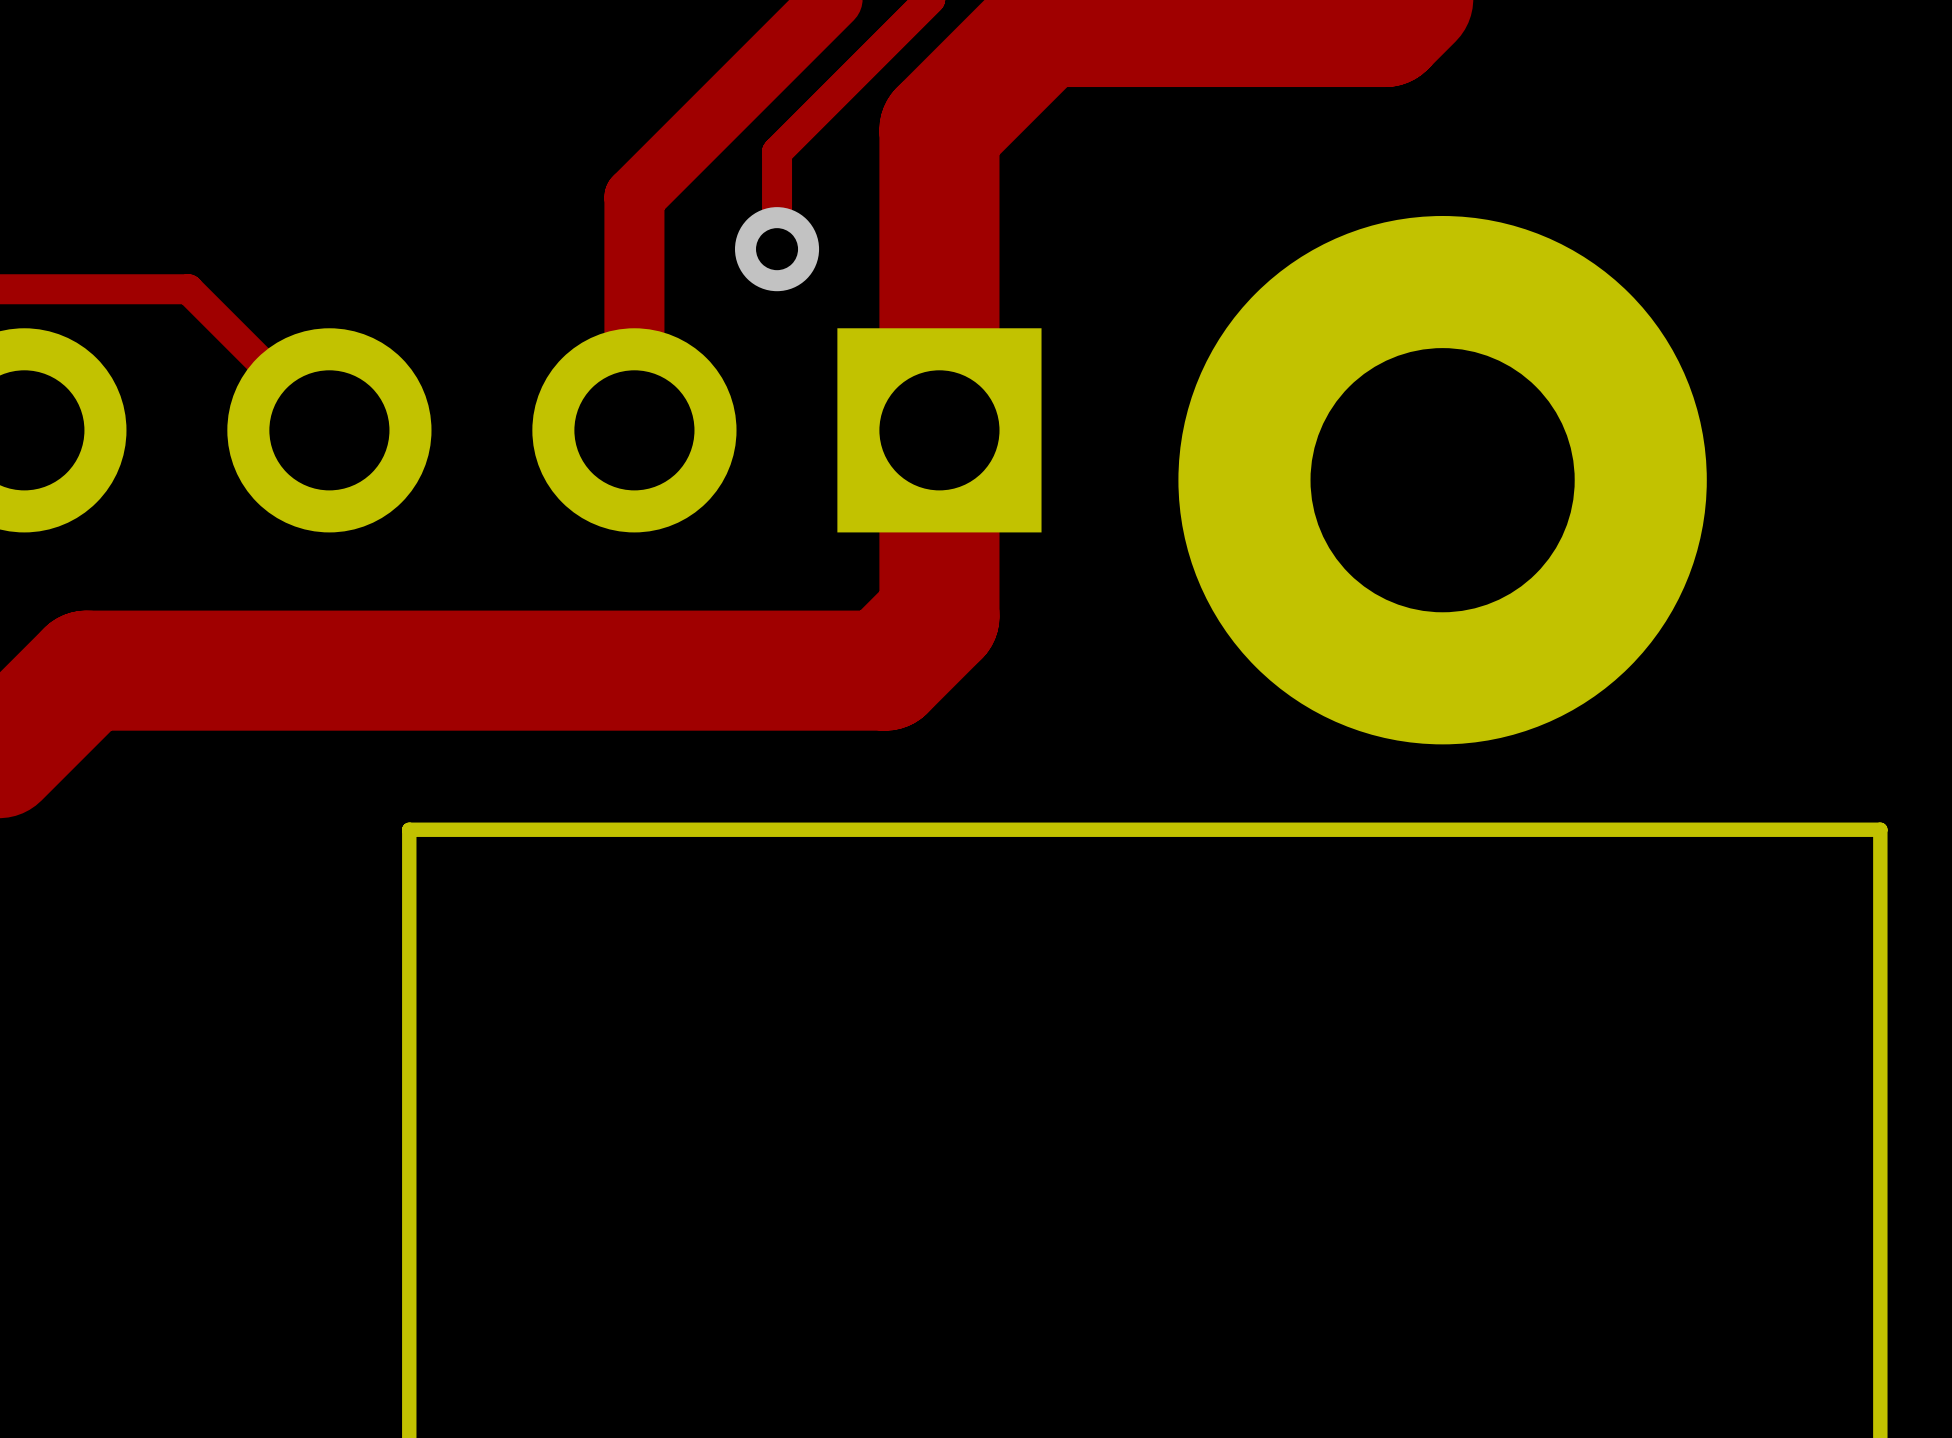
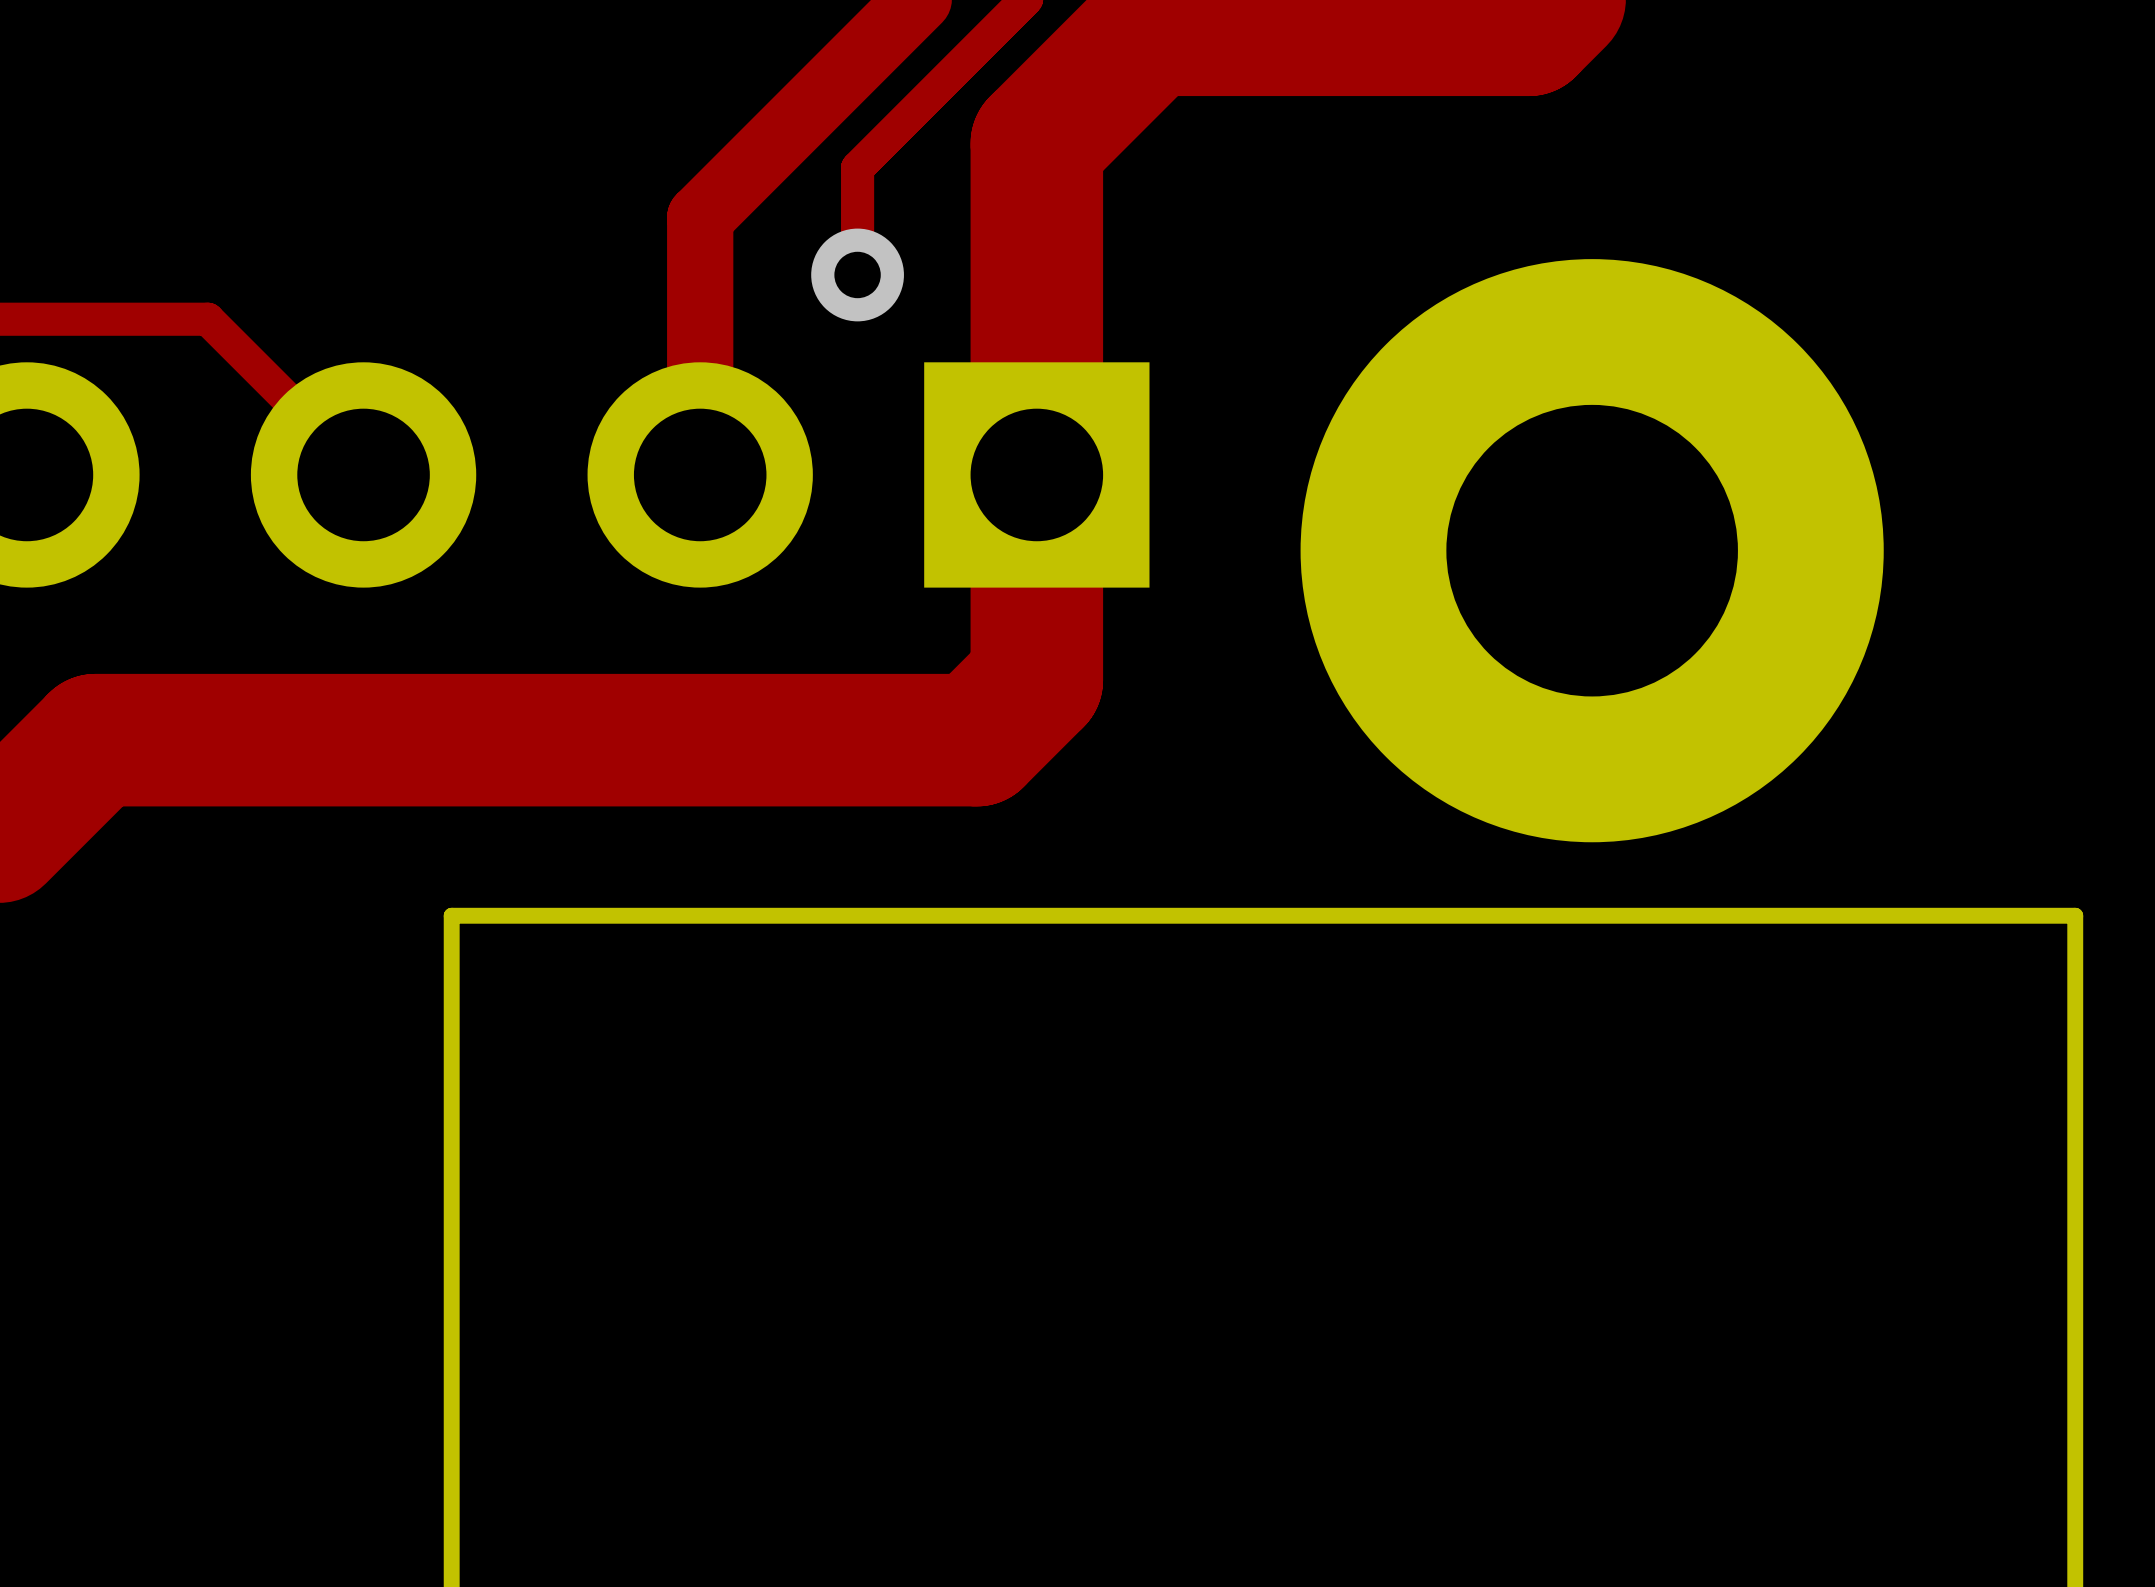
part position: (1442, 480) -> (1592, 550)

